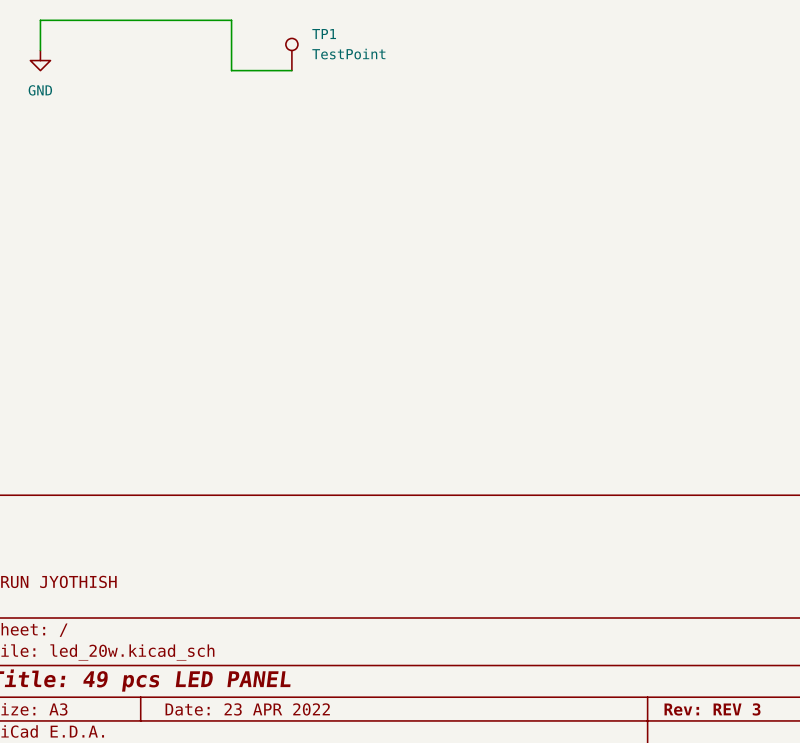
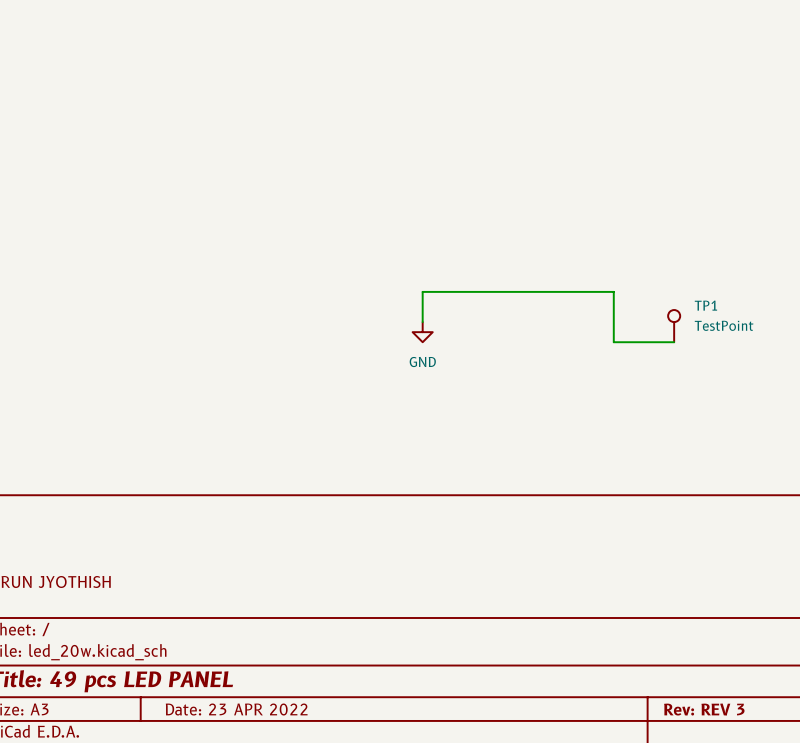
wire: (40, 50) (40, 20) (231, 20) (231, 70) (291, 70) -> none
TP1 position: (291, 54) -> (674, 326)
power symbol: GND (40, 60) -> none
wire: none -> (422, 322) (422, 291) (613, 291) (613, 342) (674, 342)
power symbol: none -> GND (422, 332)

